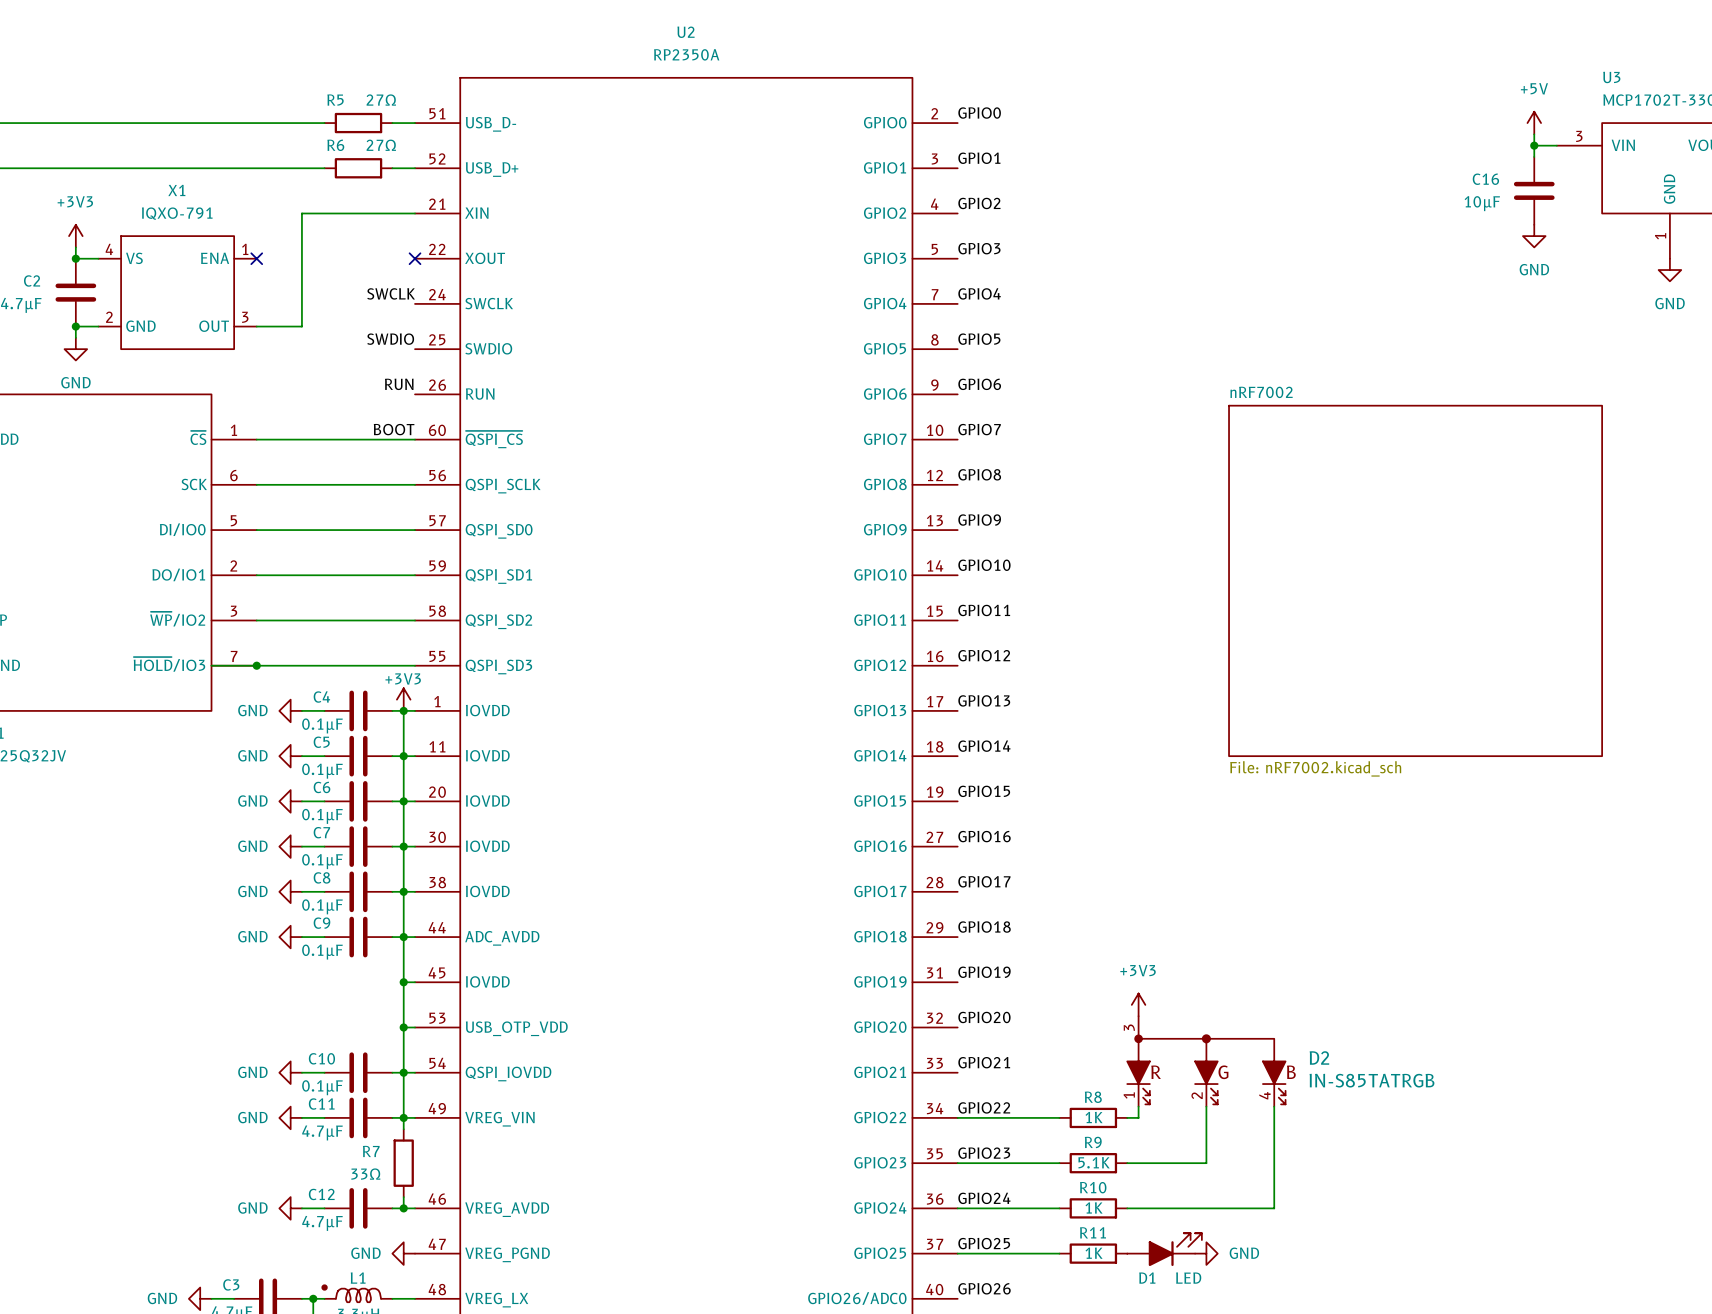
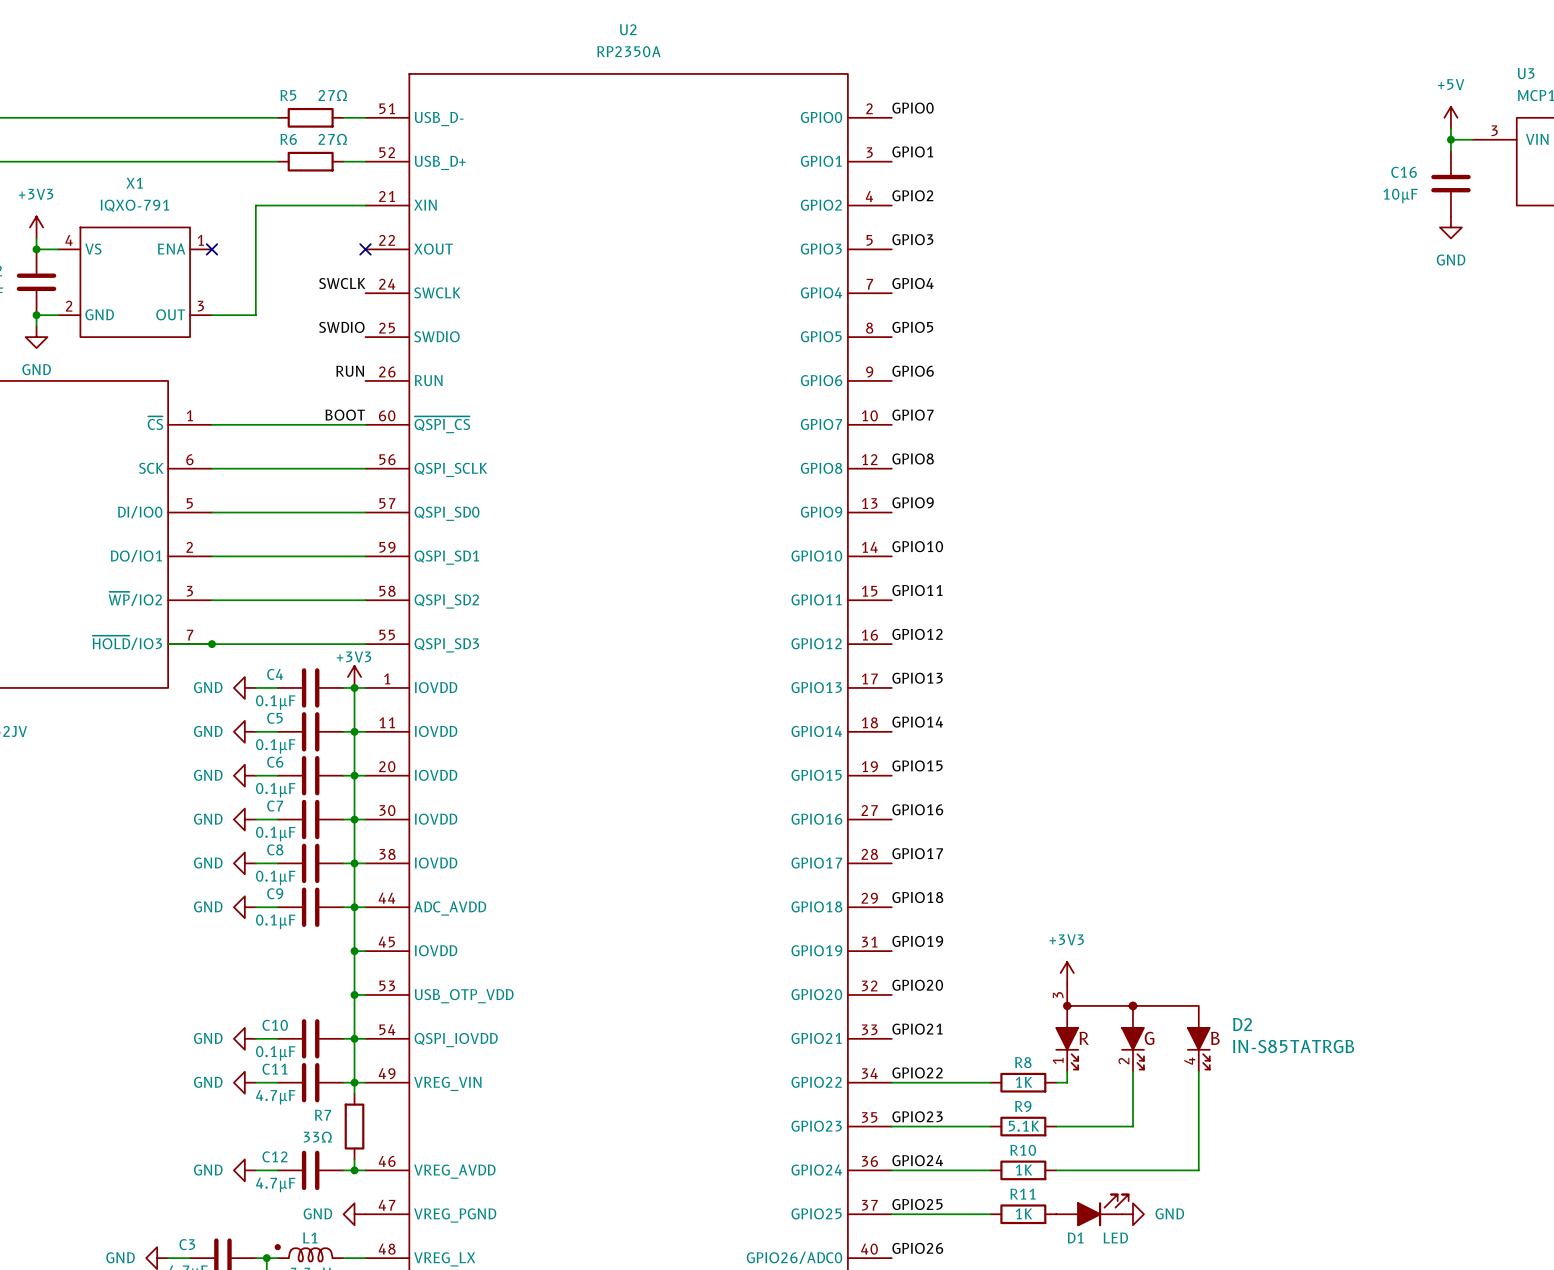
sheet nRF7002: File: nRF7002.kicad_sch (1415, 580) -> none

